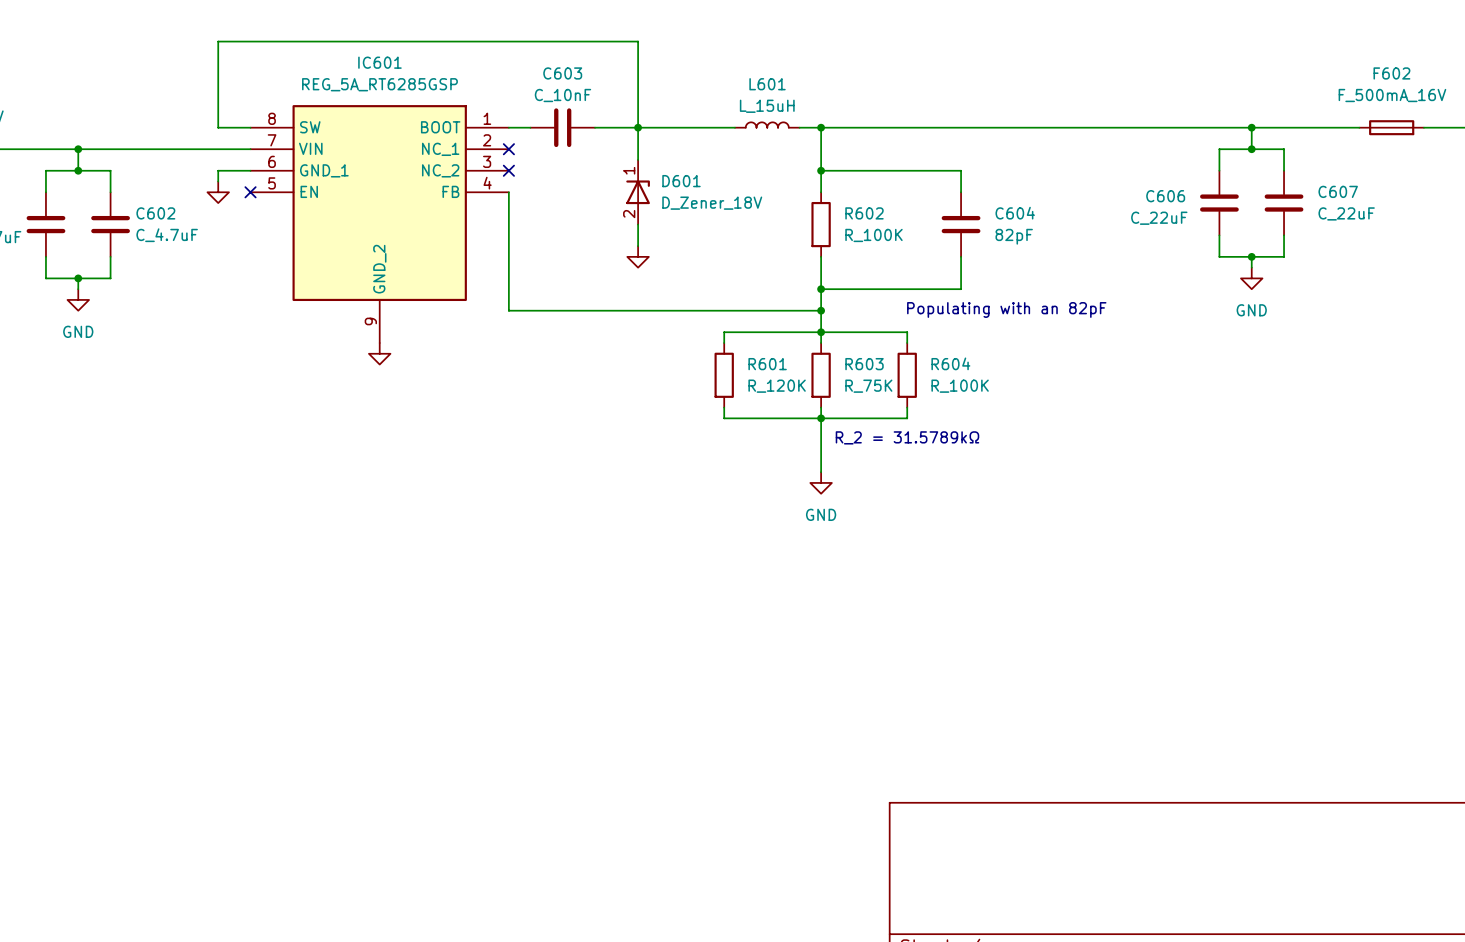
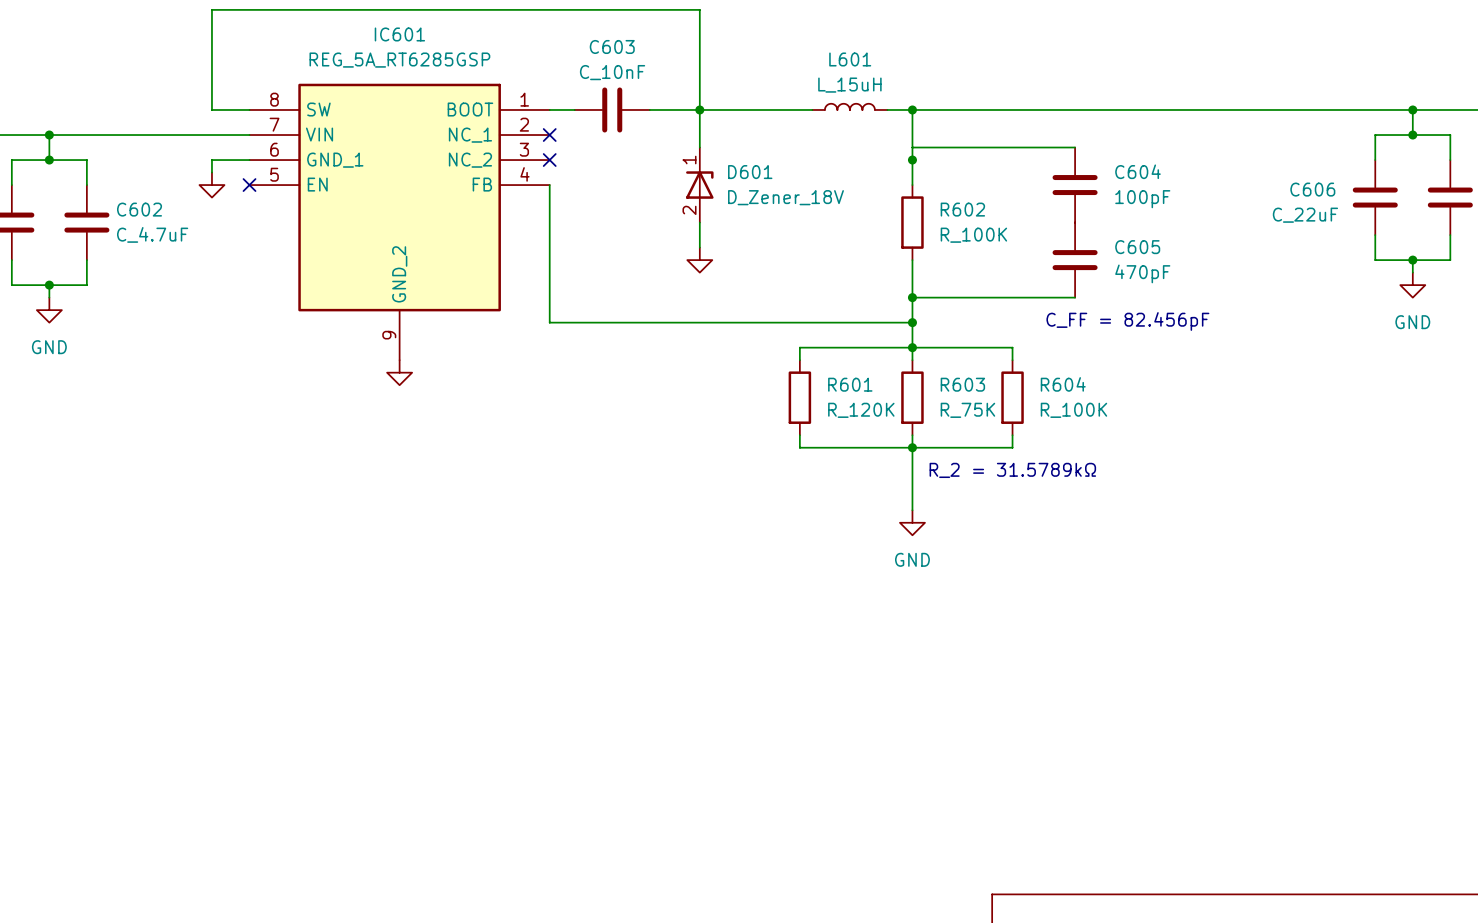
wire: none -> (912, 147) (1075, 147)
wire: (821, 170) (961, 170) (961, 192) -> none
C604 position: (961, 224) -> (1075, 185)
C604 value: 82pF (1014, 236) -> 100pF (1142, 199)
C605: none -> 470pF (1075, 260)
text: Populating with an 82pF (1006, 309) -> C_FF = 82.456pF (1127, 321)

